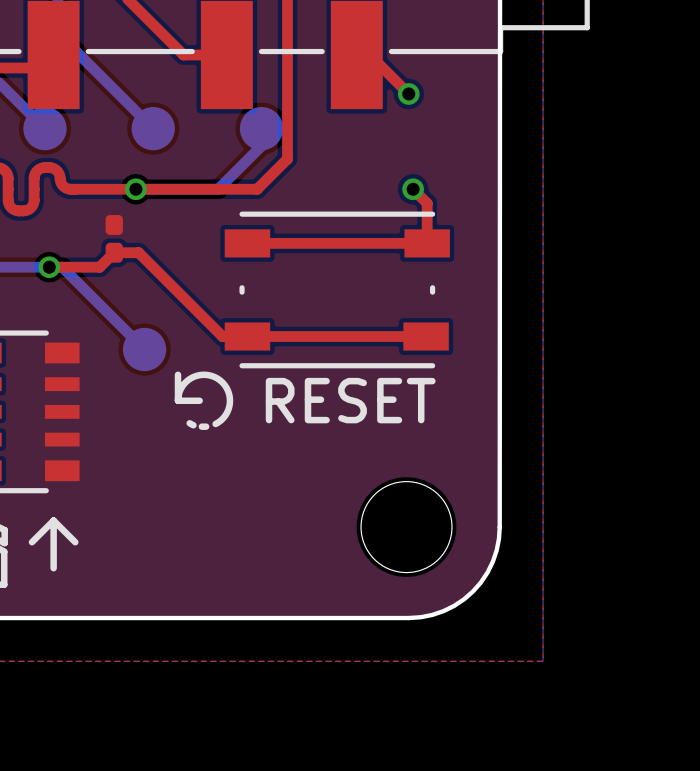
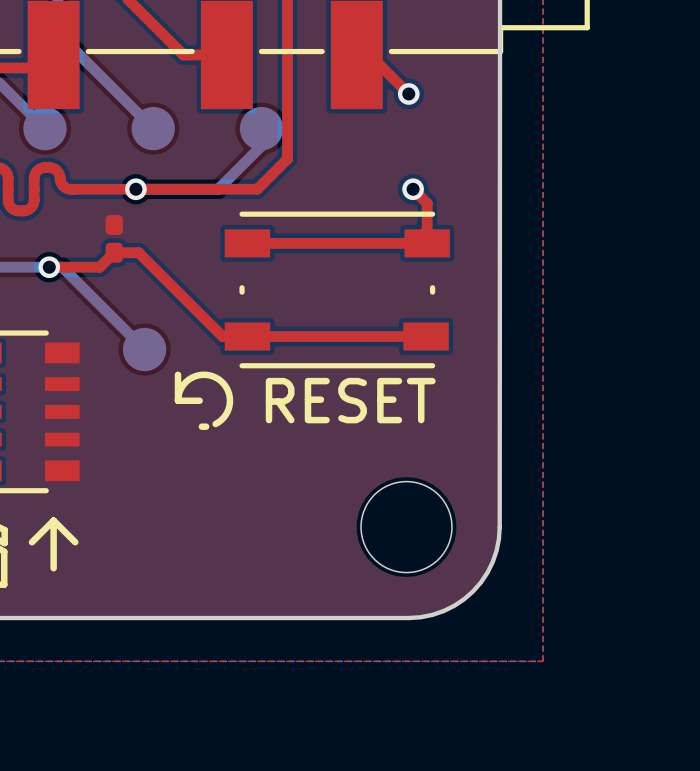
line: (189, 423) (193, 425) -> none

